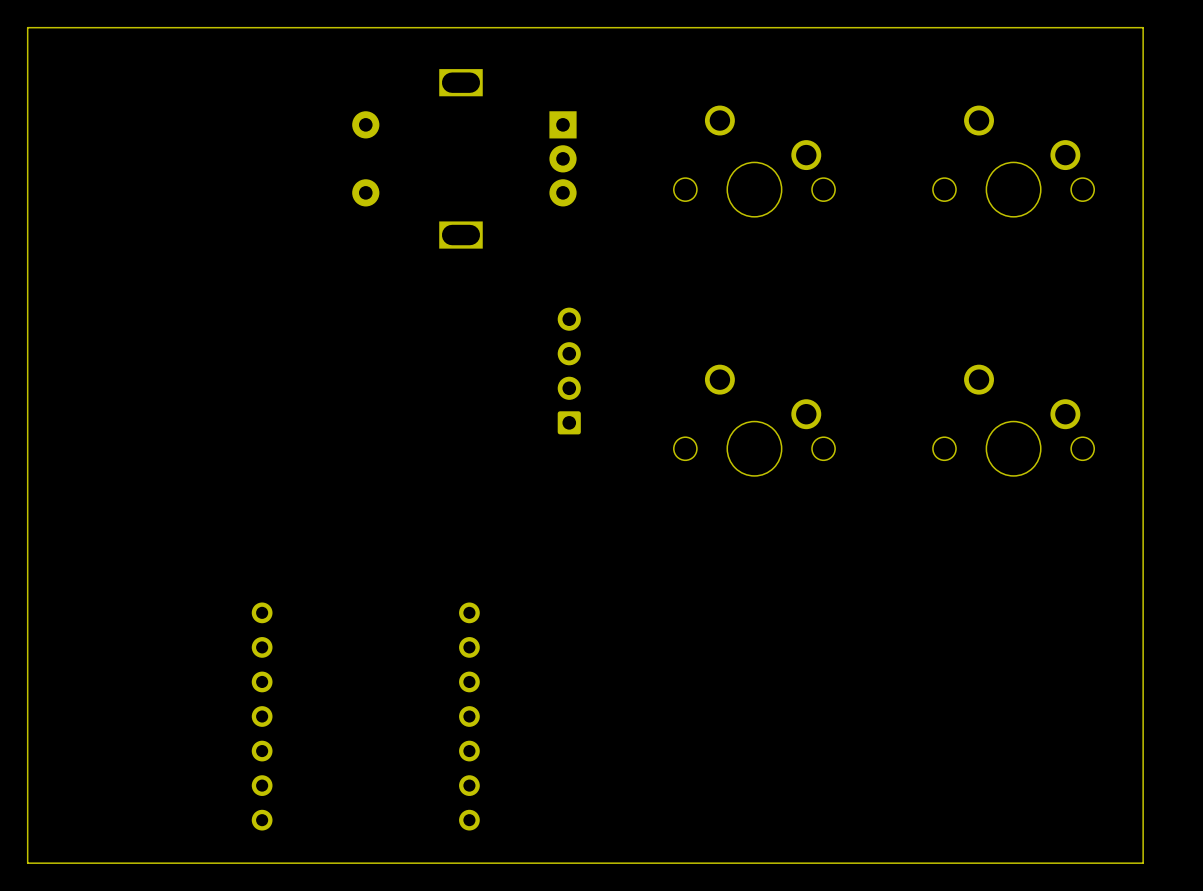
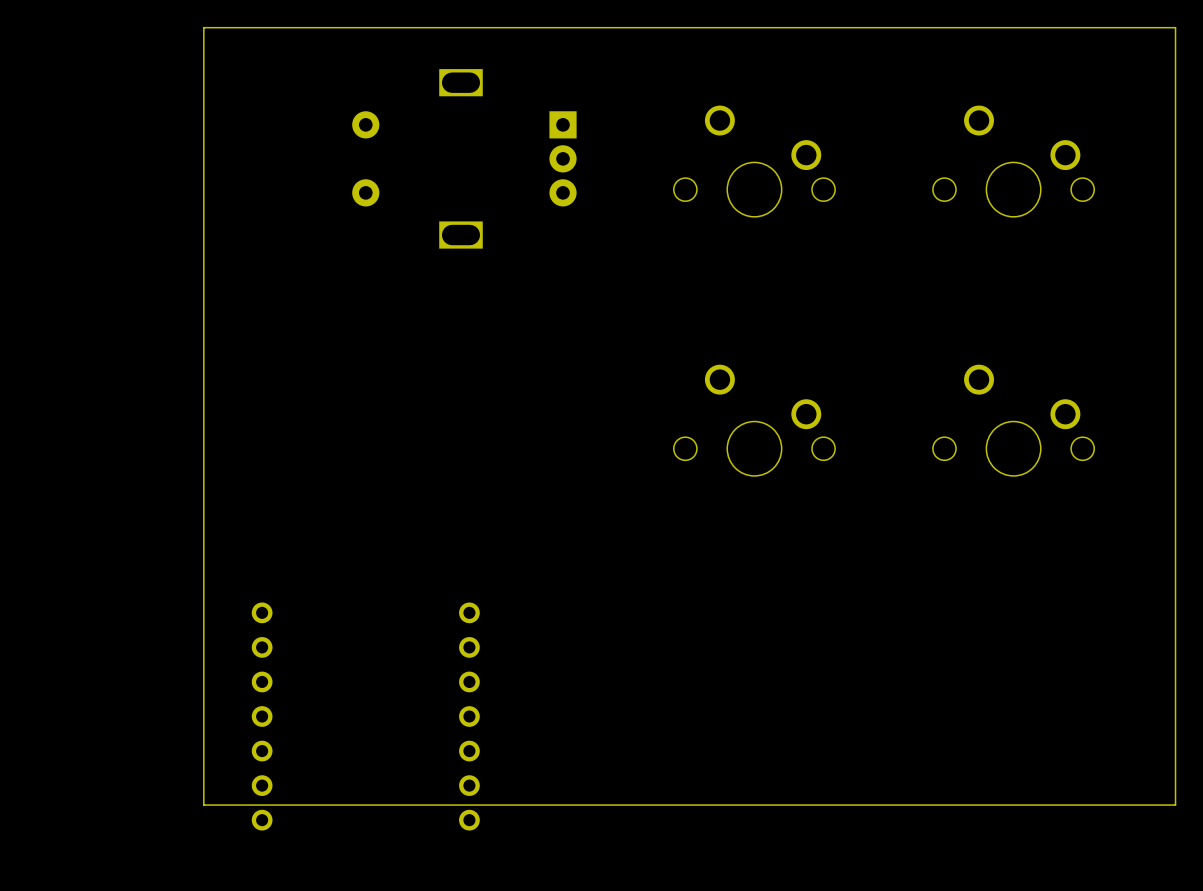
board edge: (1143, 27) (1143, 863) (27, 863) (27, 27) (203, 27) -> (1143, 27) (1175, 27) (1175, 805) (203, 805) (203, 27)
part: (569, 371) -> none

